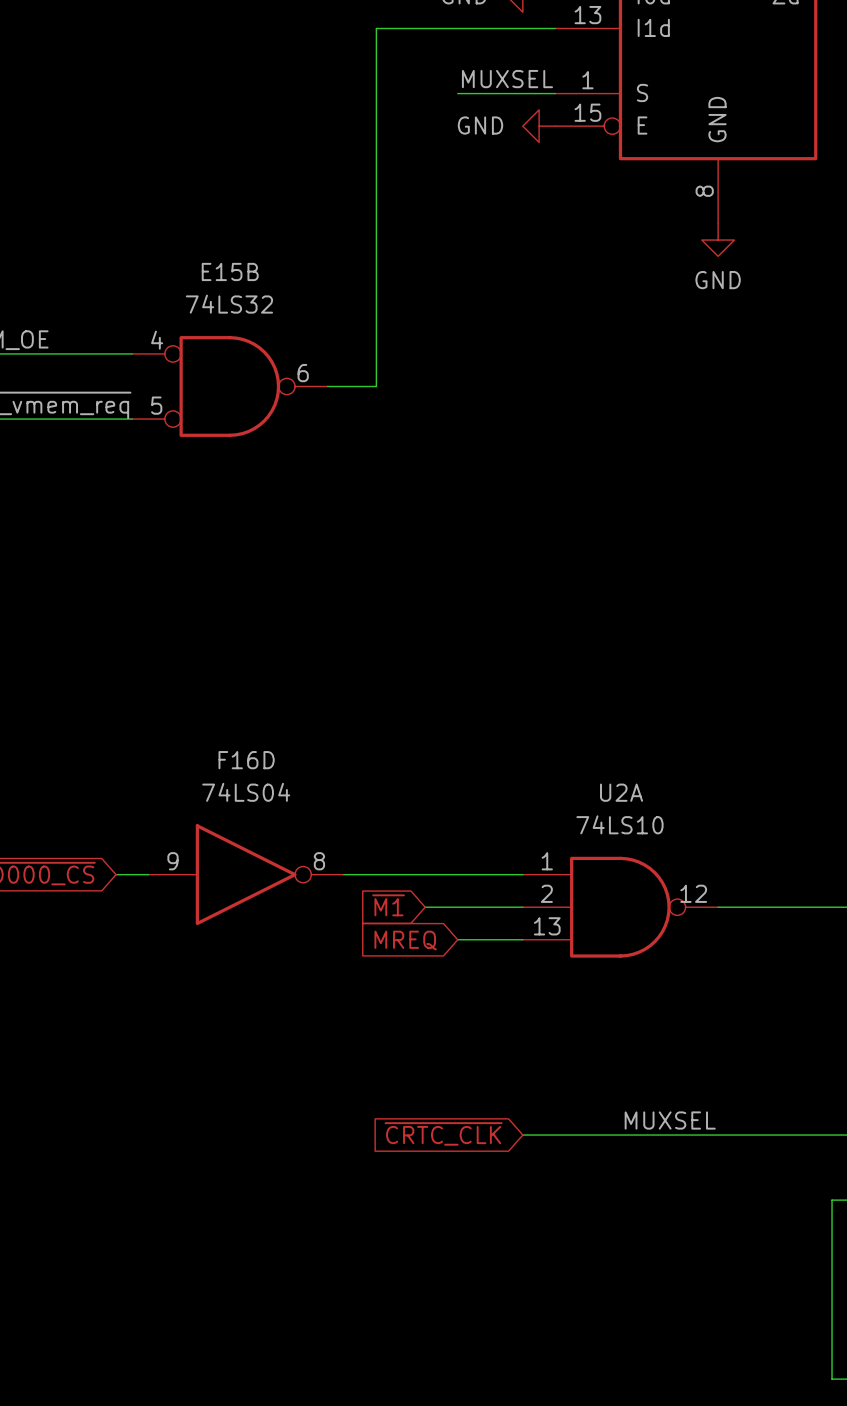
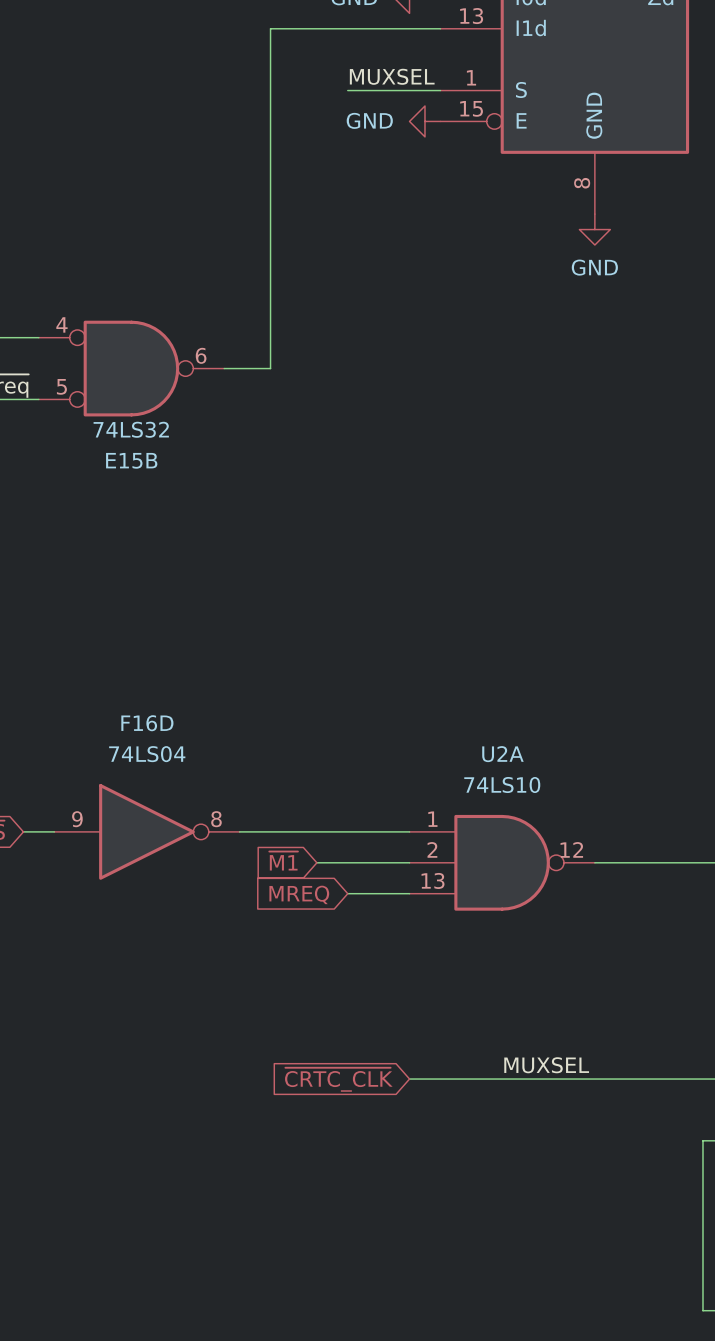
E15B name position: E15B (230, 271) -> E15B (131, 460)
E15B value position: 74LS32 (229, 304) -> 74LS32 (131, 429)

